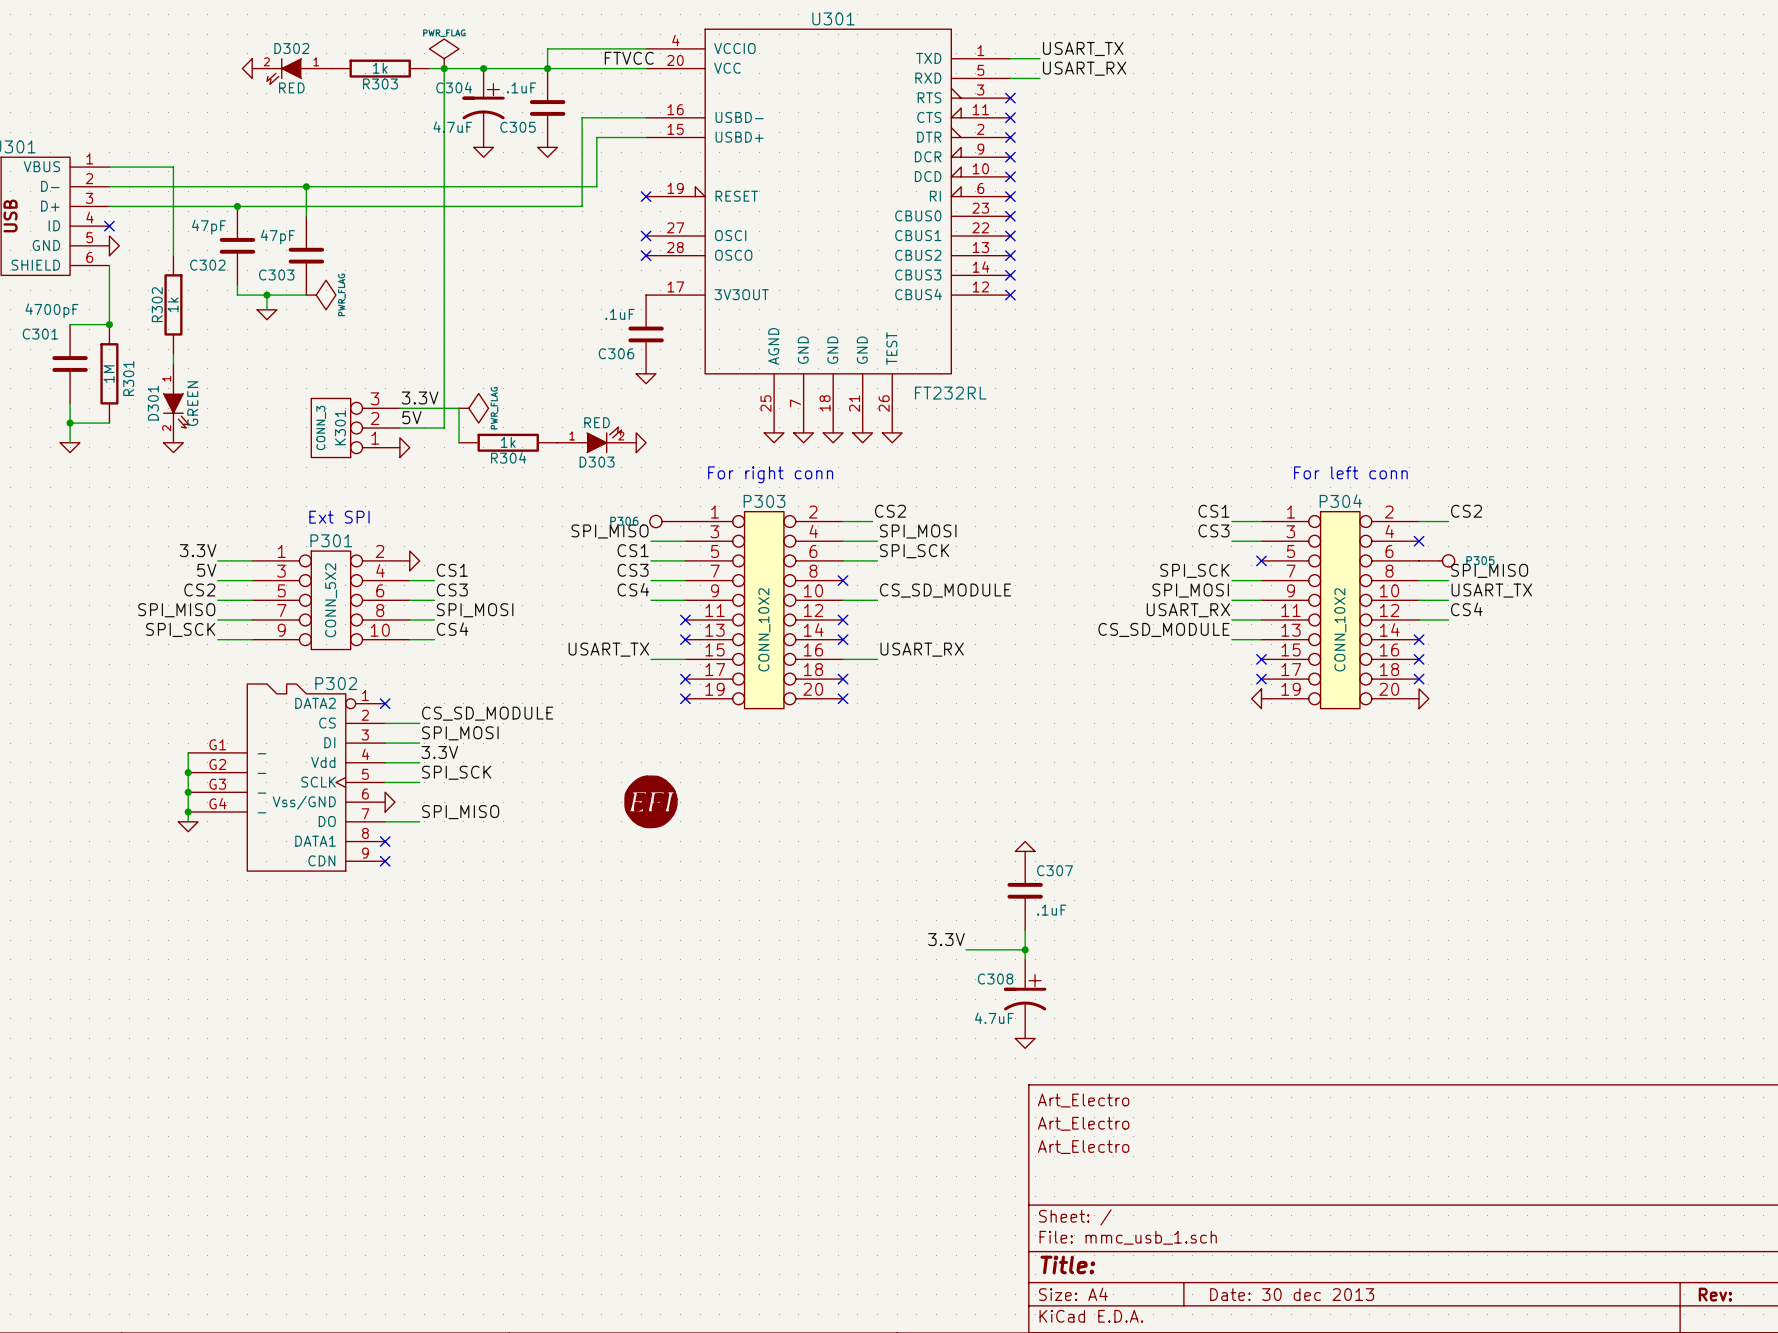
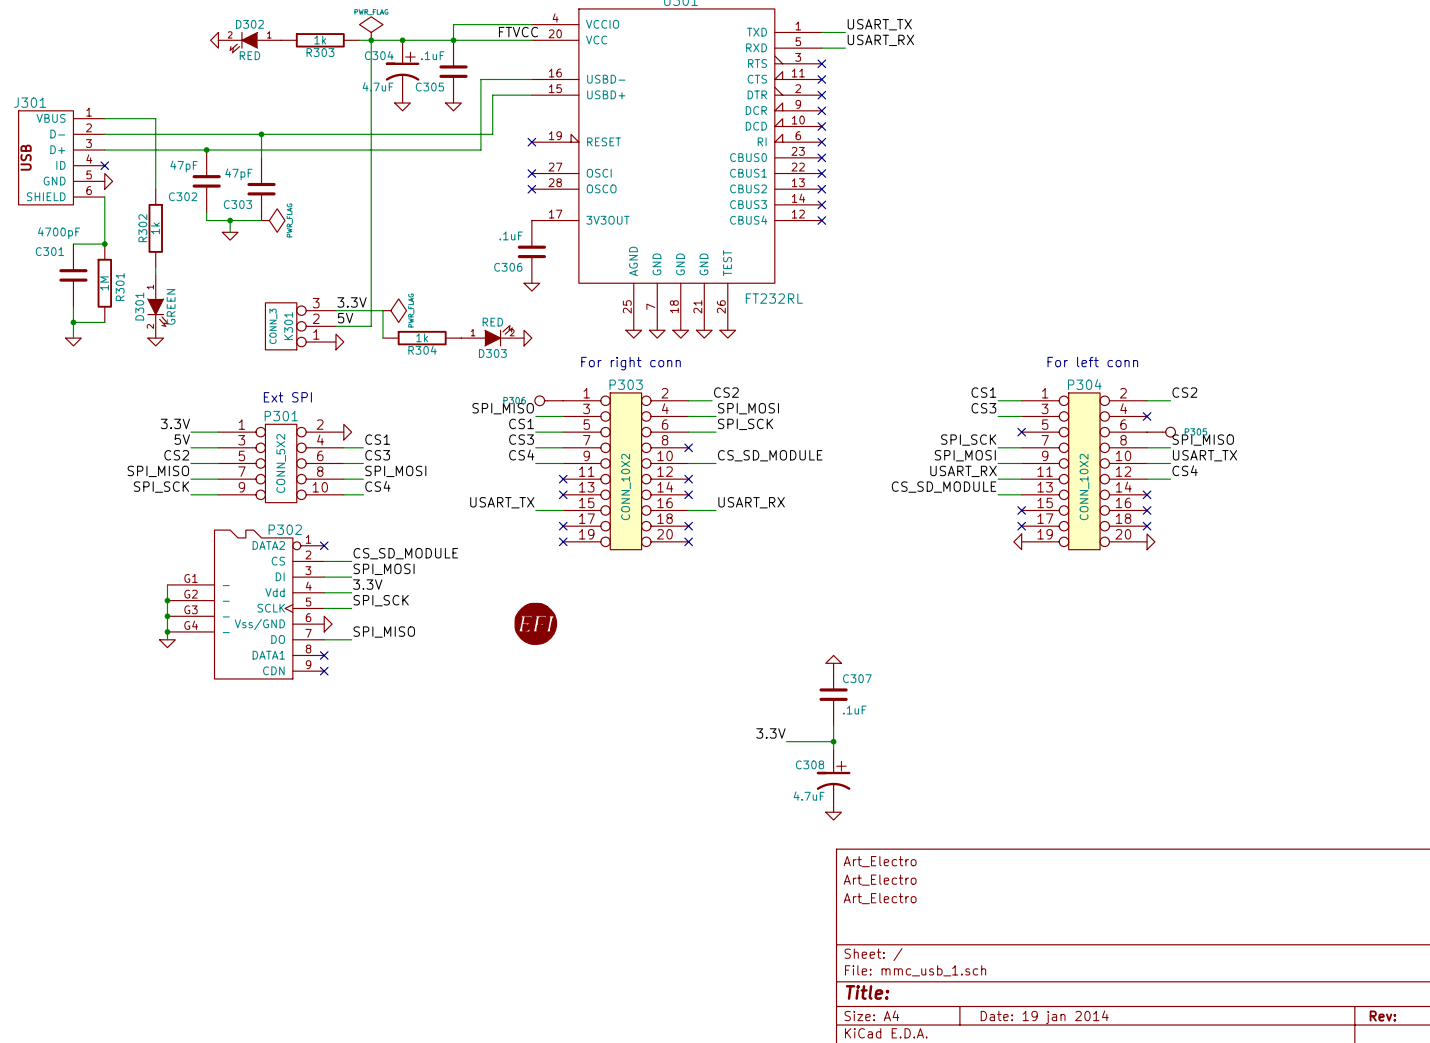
title block: Date: 30 dec 2013 (1292, 1294) -> Date: 19 jan 2014 (1044, 1017)

